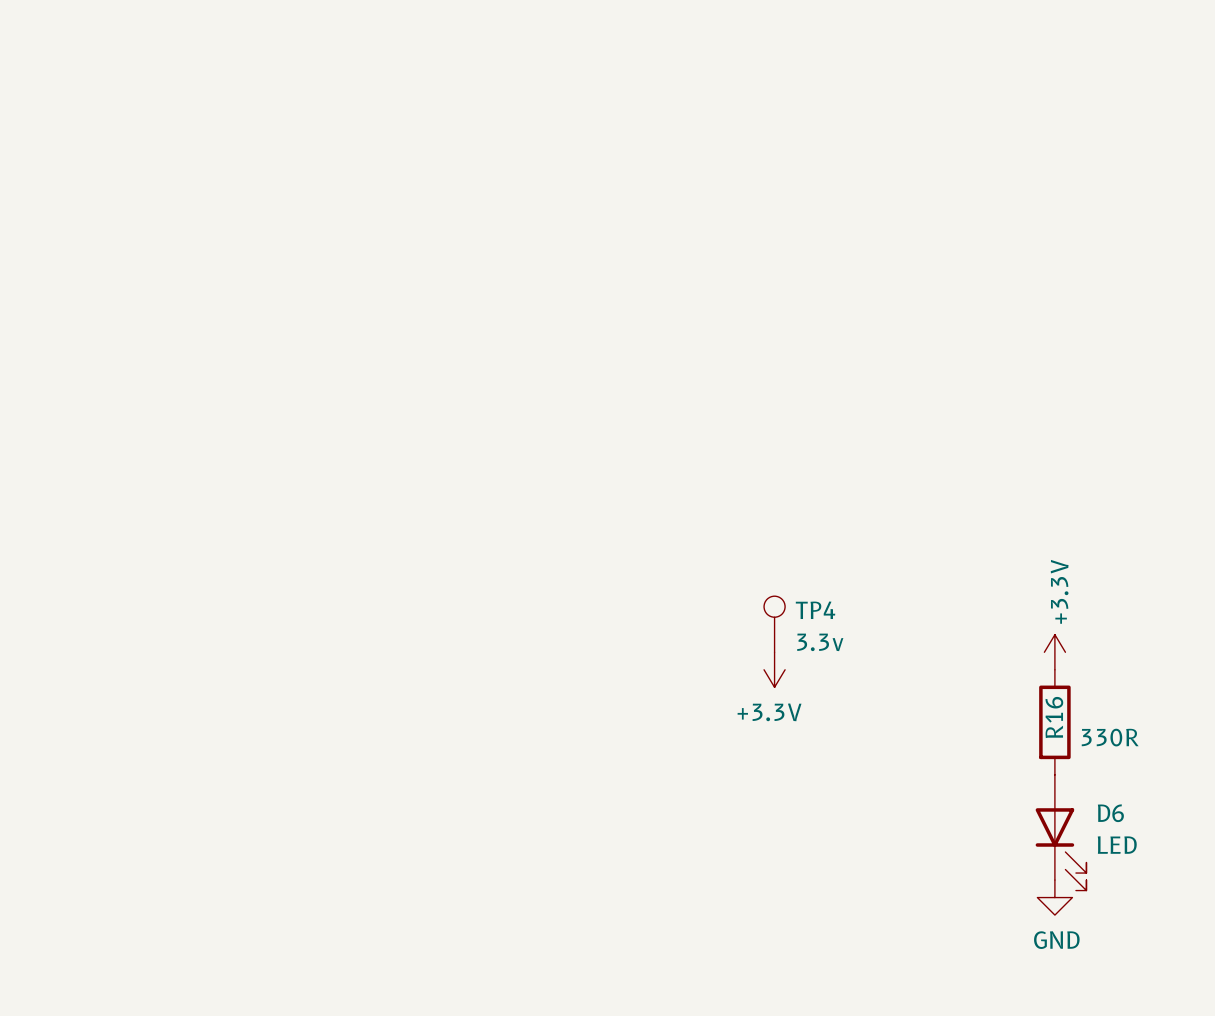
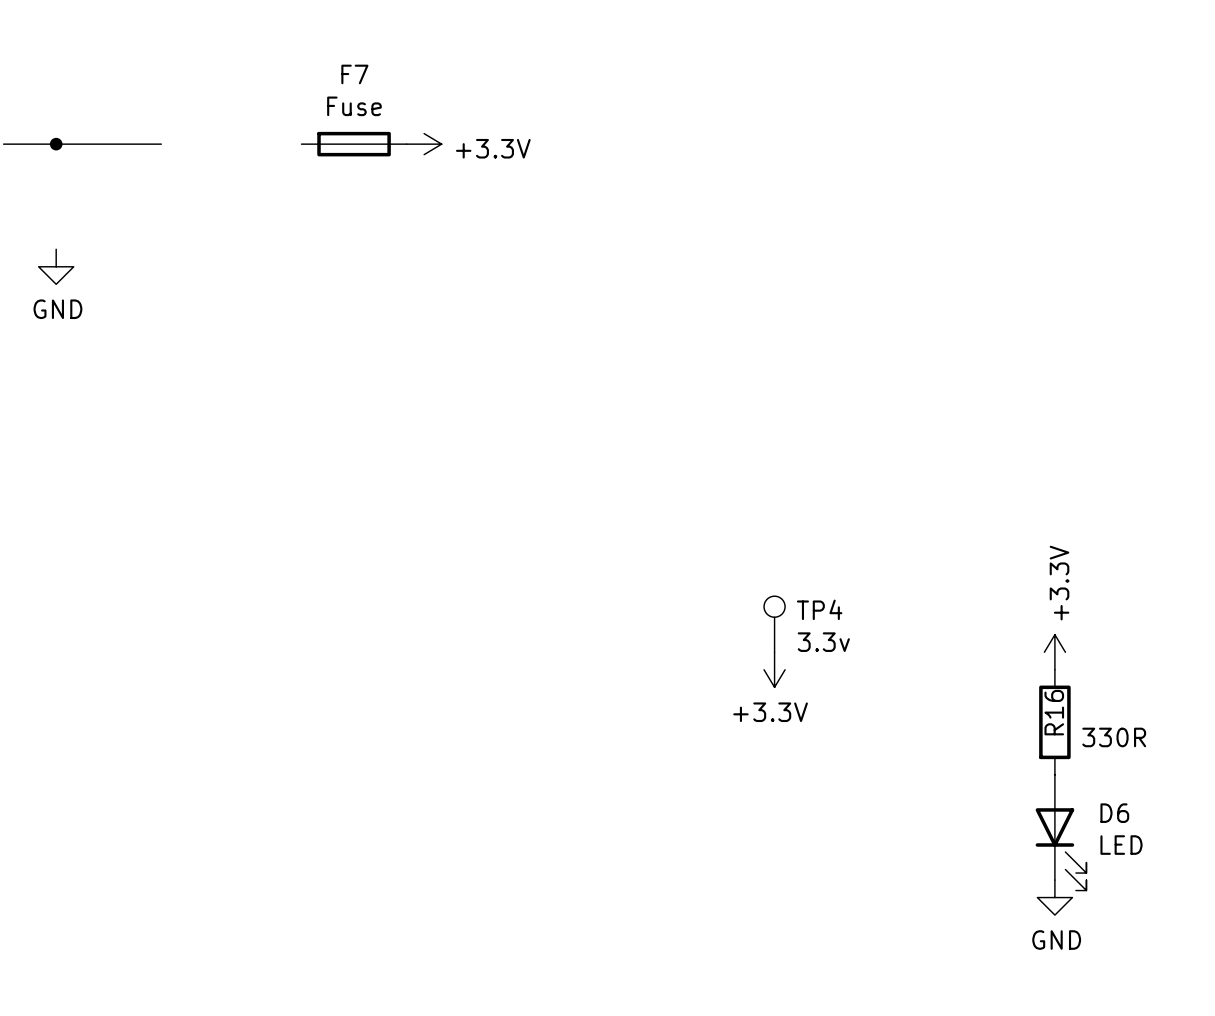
wire: none -> (3, 144) (161, 144)
junction: none -> (56, 144)
F7: none -> Fuse (354, 144)
power symbol: none -> +3.3V (424, 144)
power symbol: none -> GND (56, 266)

